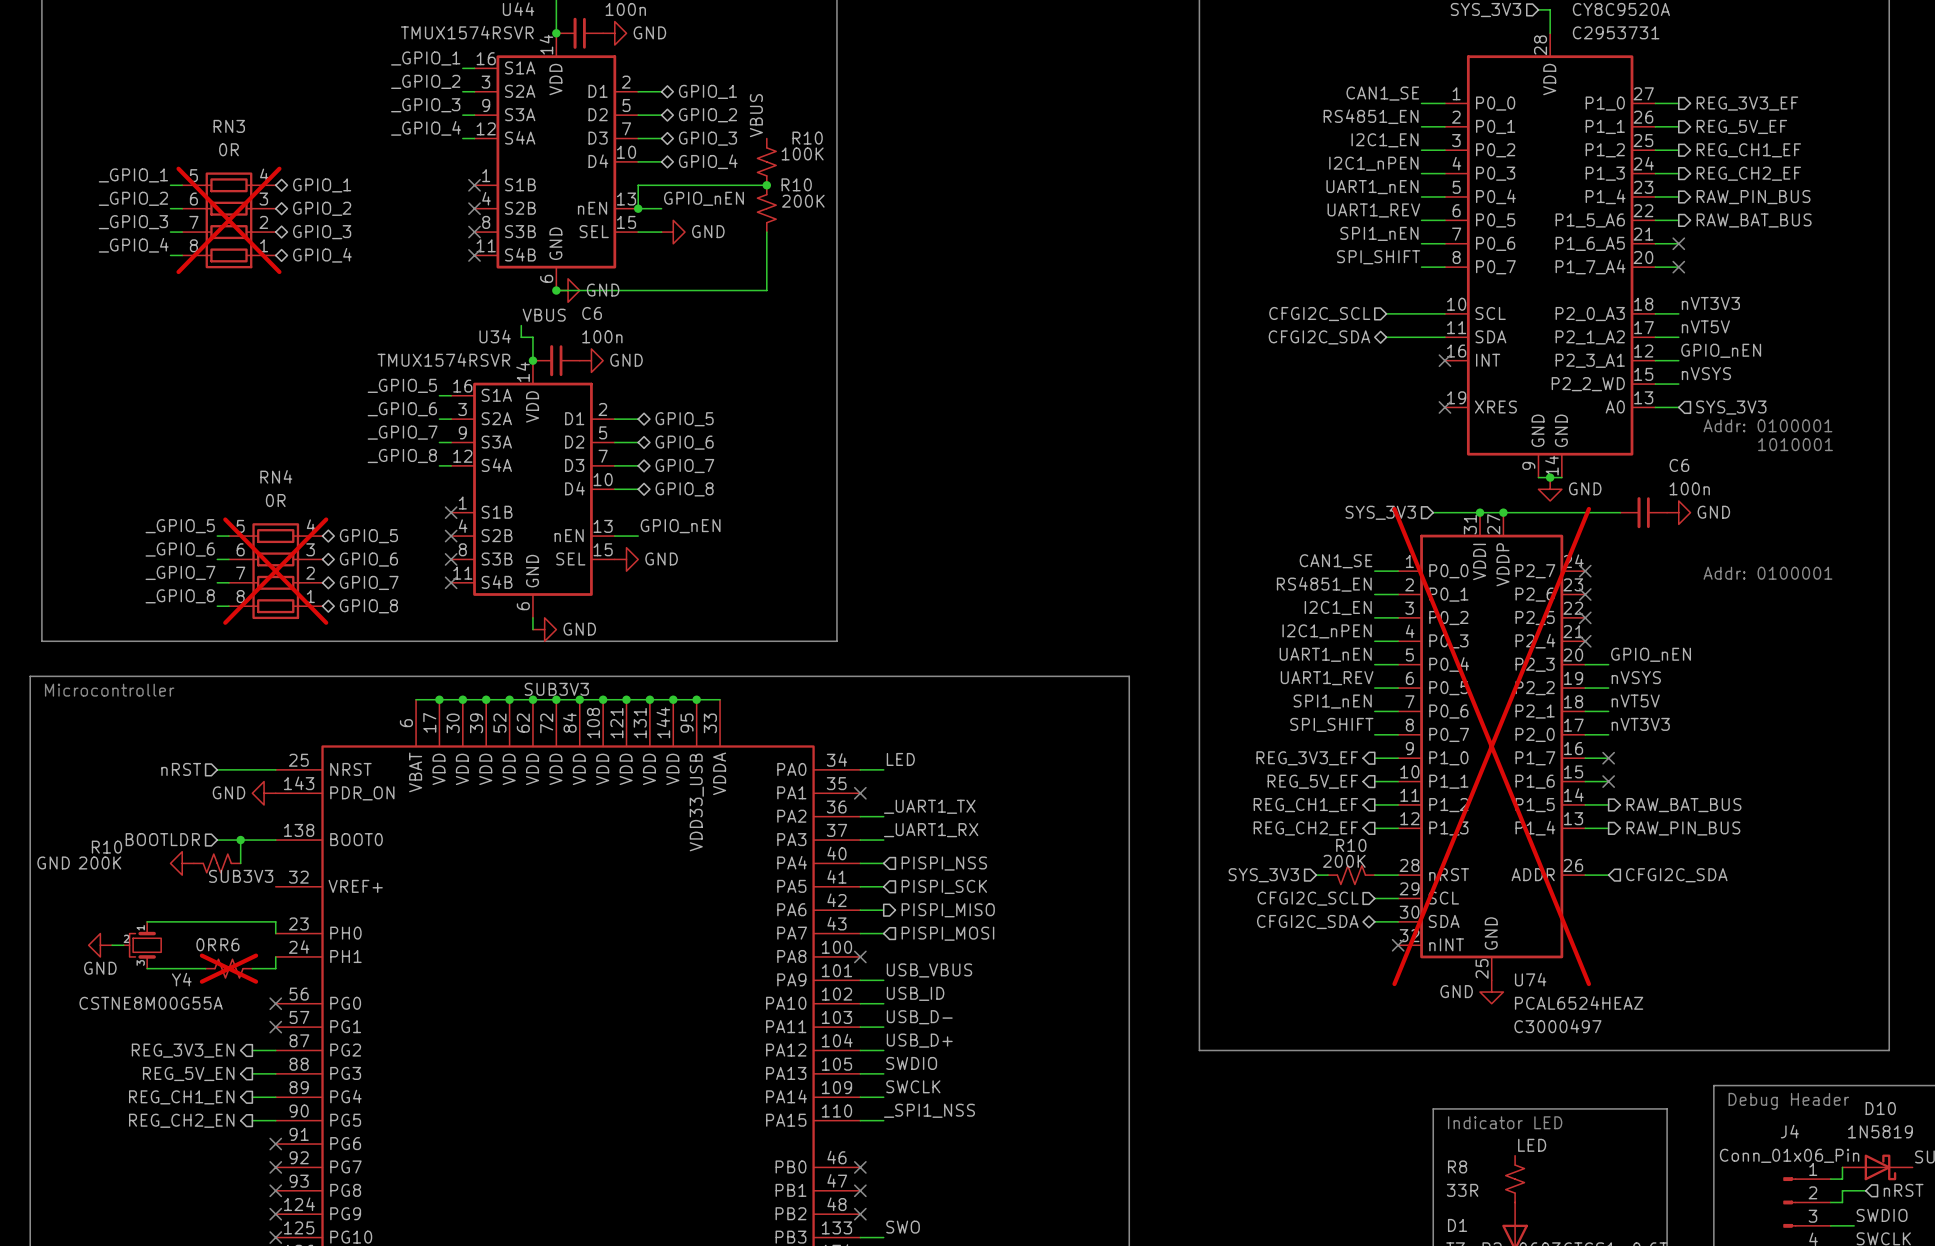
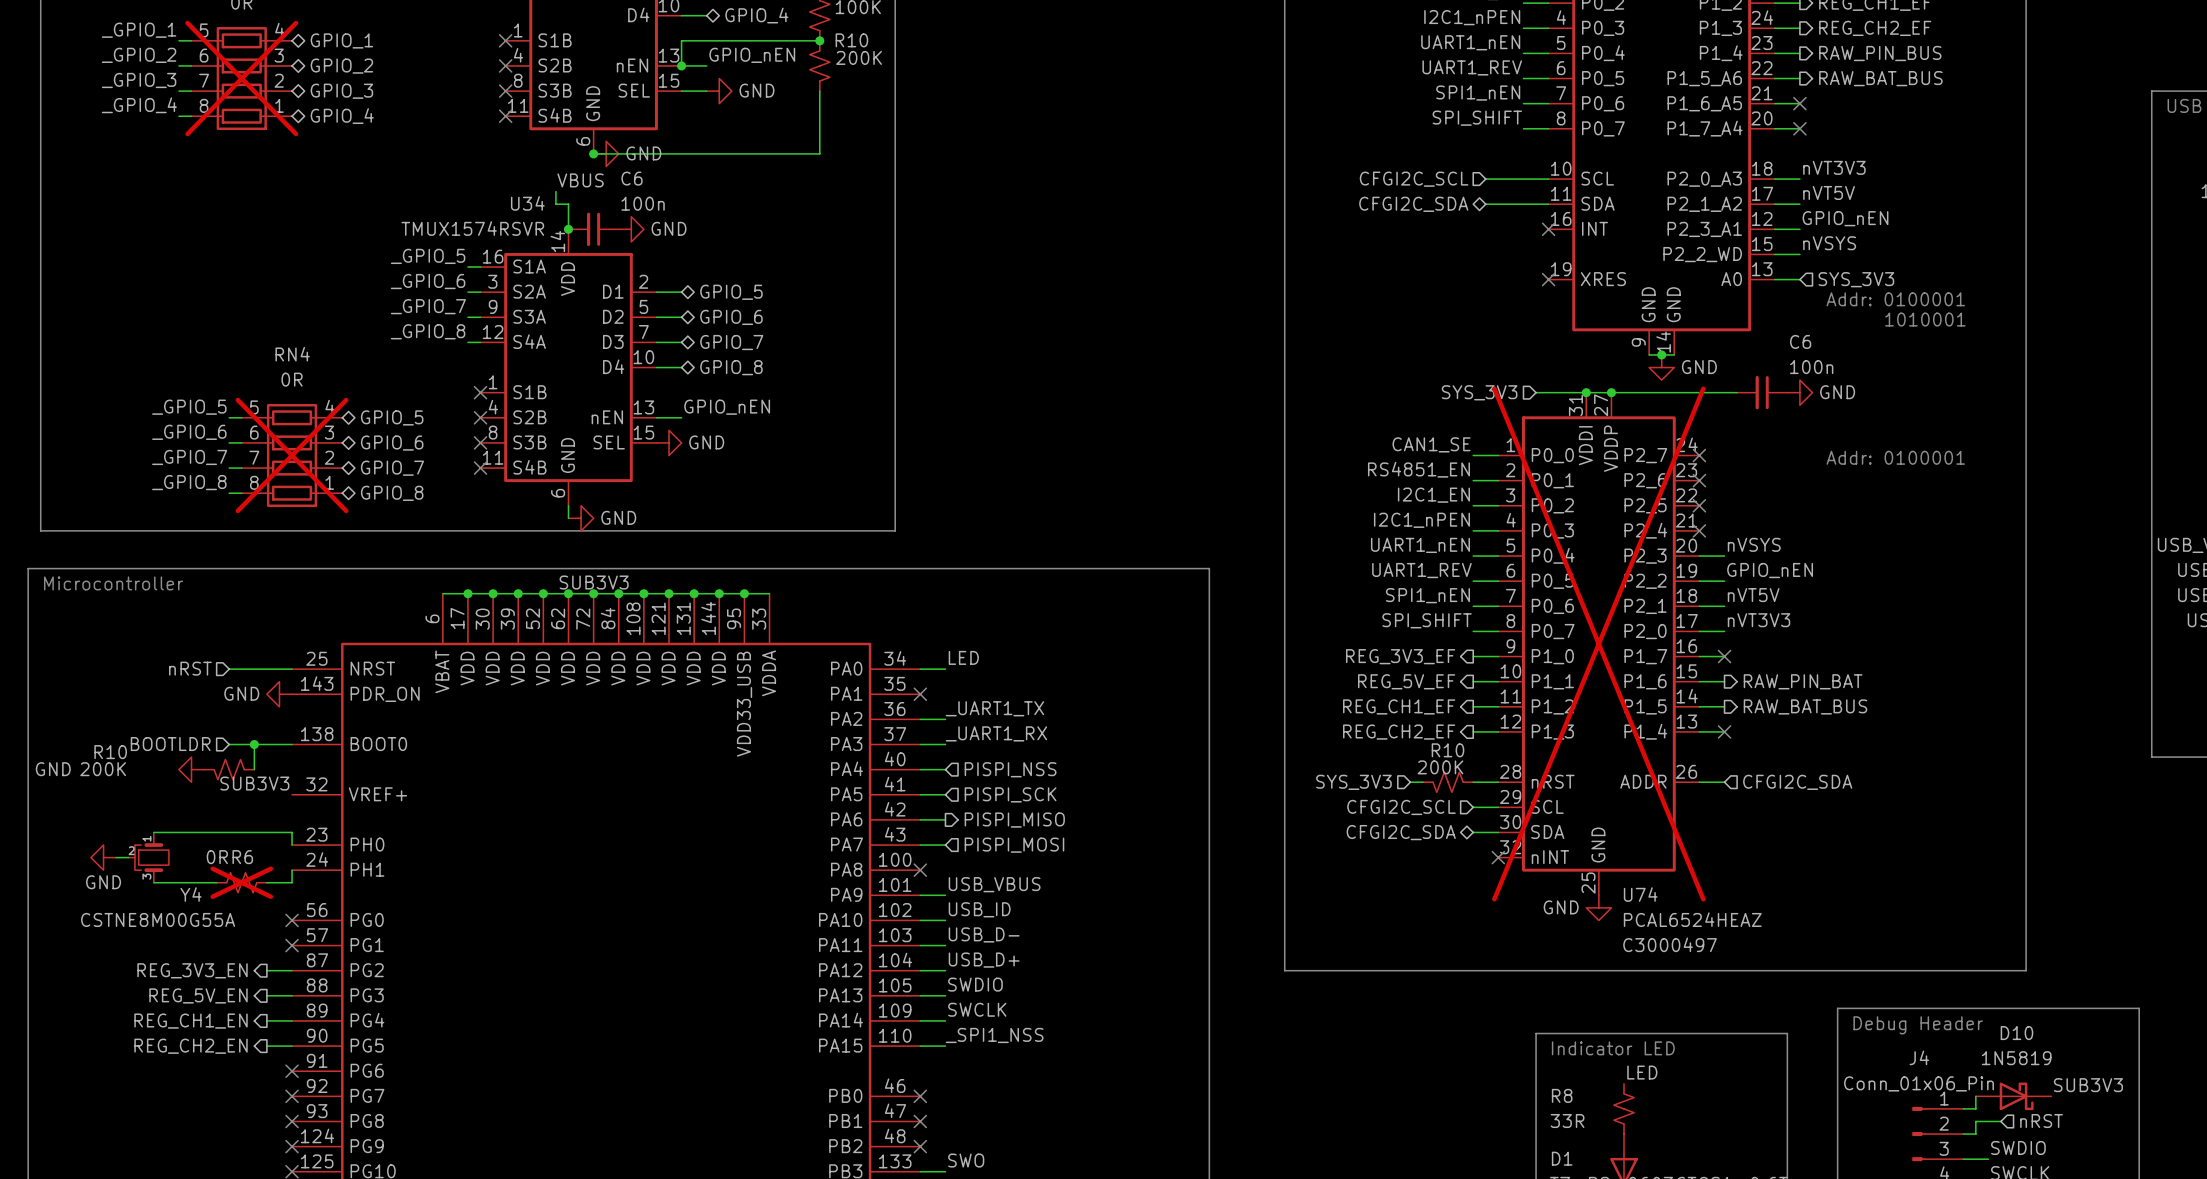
label: GPIO_nEN (1651, 654) -> nVSYS (1754, 544)
label: nVSYS (1636, 677) -> GPIO_nEN (1770, 570)
no-connect mark position: (1608, 781) -> (1724, 731)
hierarchical label: none -> RAW_PIN_BAT (1803, 681)
hierarchical label: RAW_PIN_BUS (1683, 828) -> none

